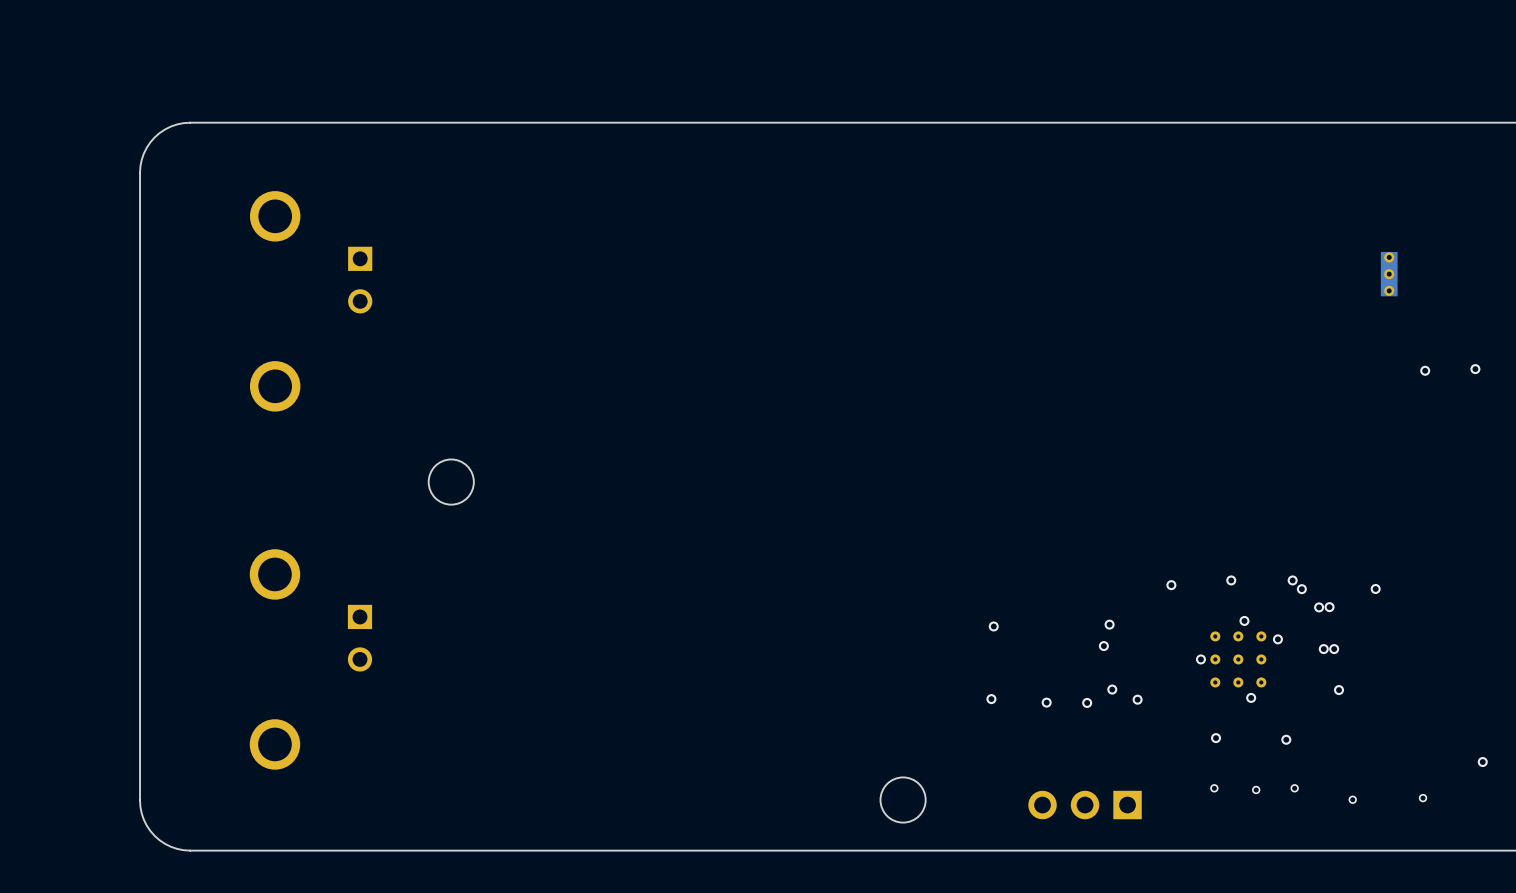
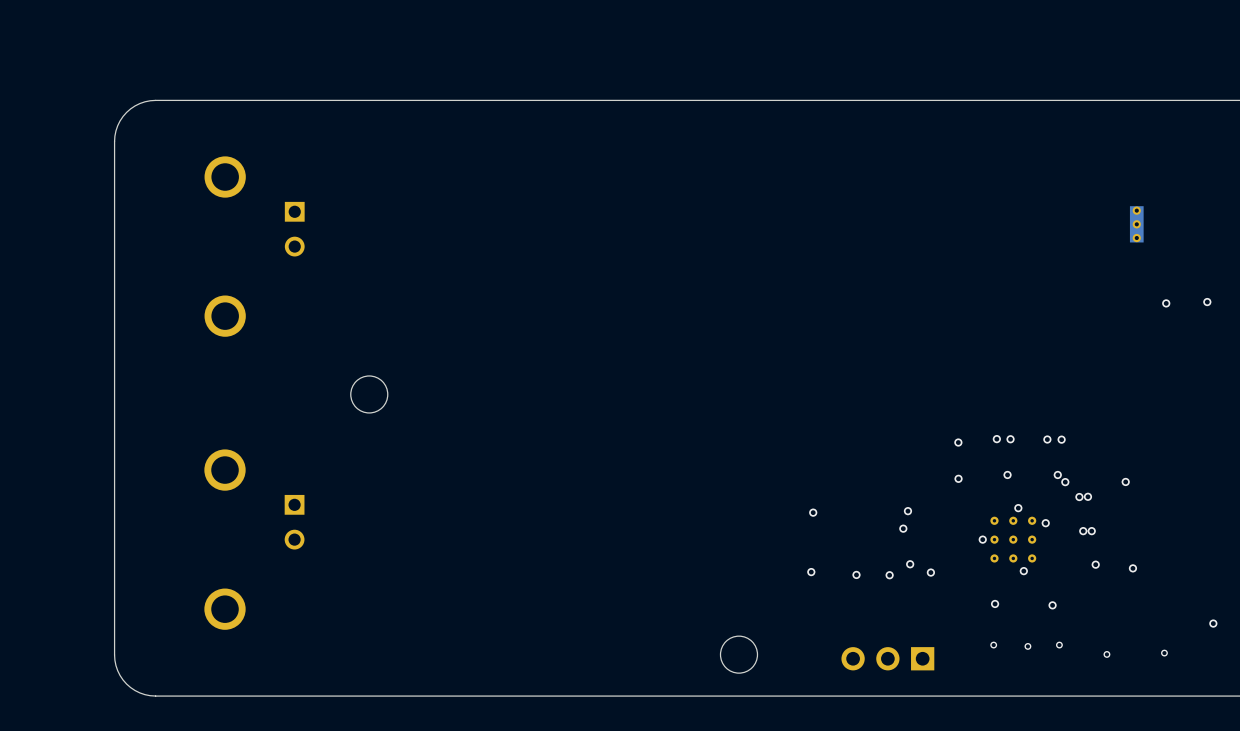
via: none -> (996, 439)
via: none -> (1010, 439)
via: none -> (1047, 439)
via: none -> (1061, 439)
via: none -> (958, 442)
via: none -> (1132, 568)

